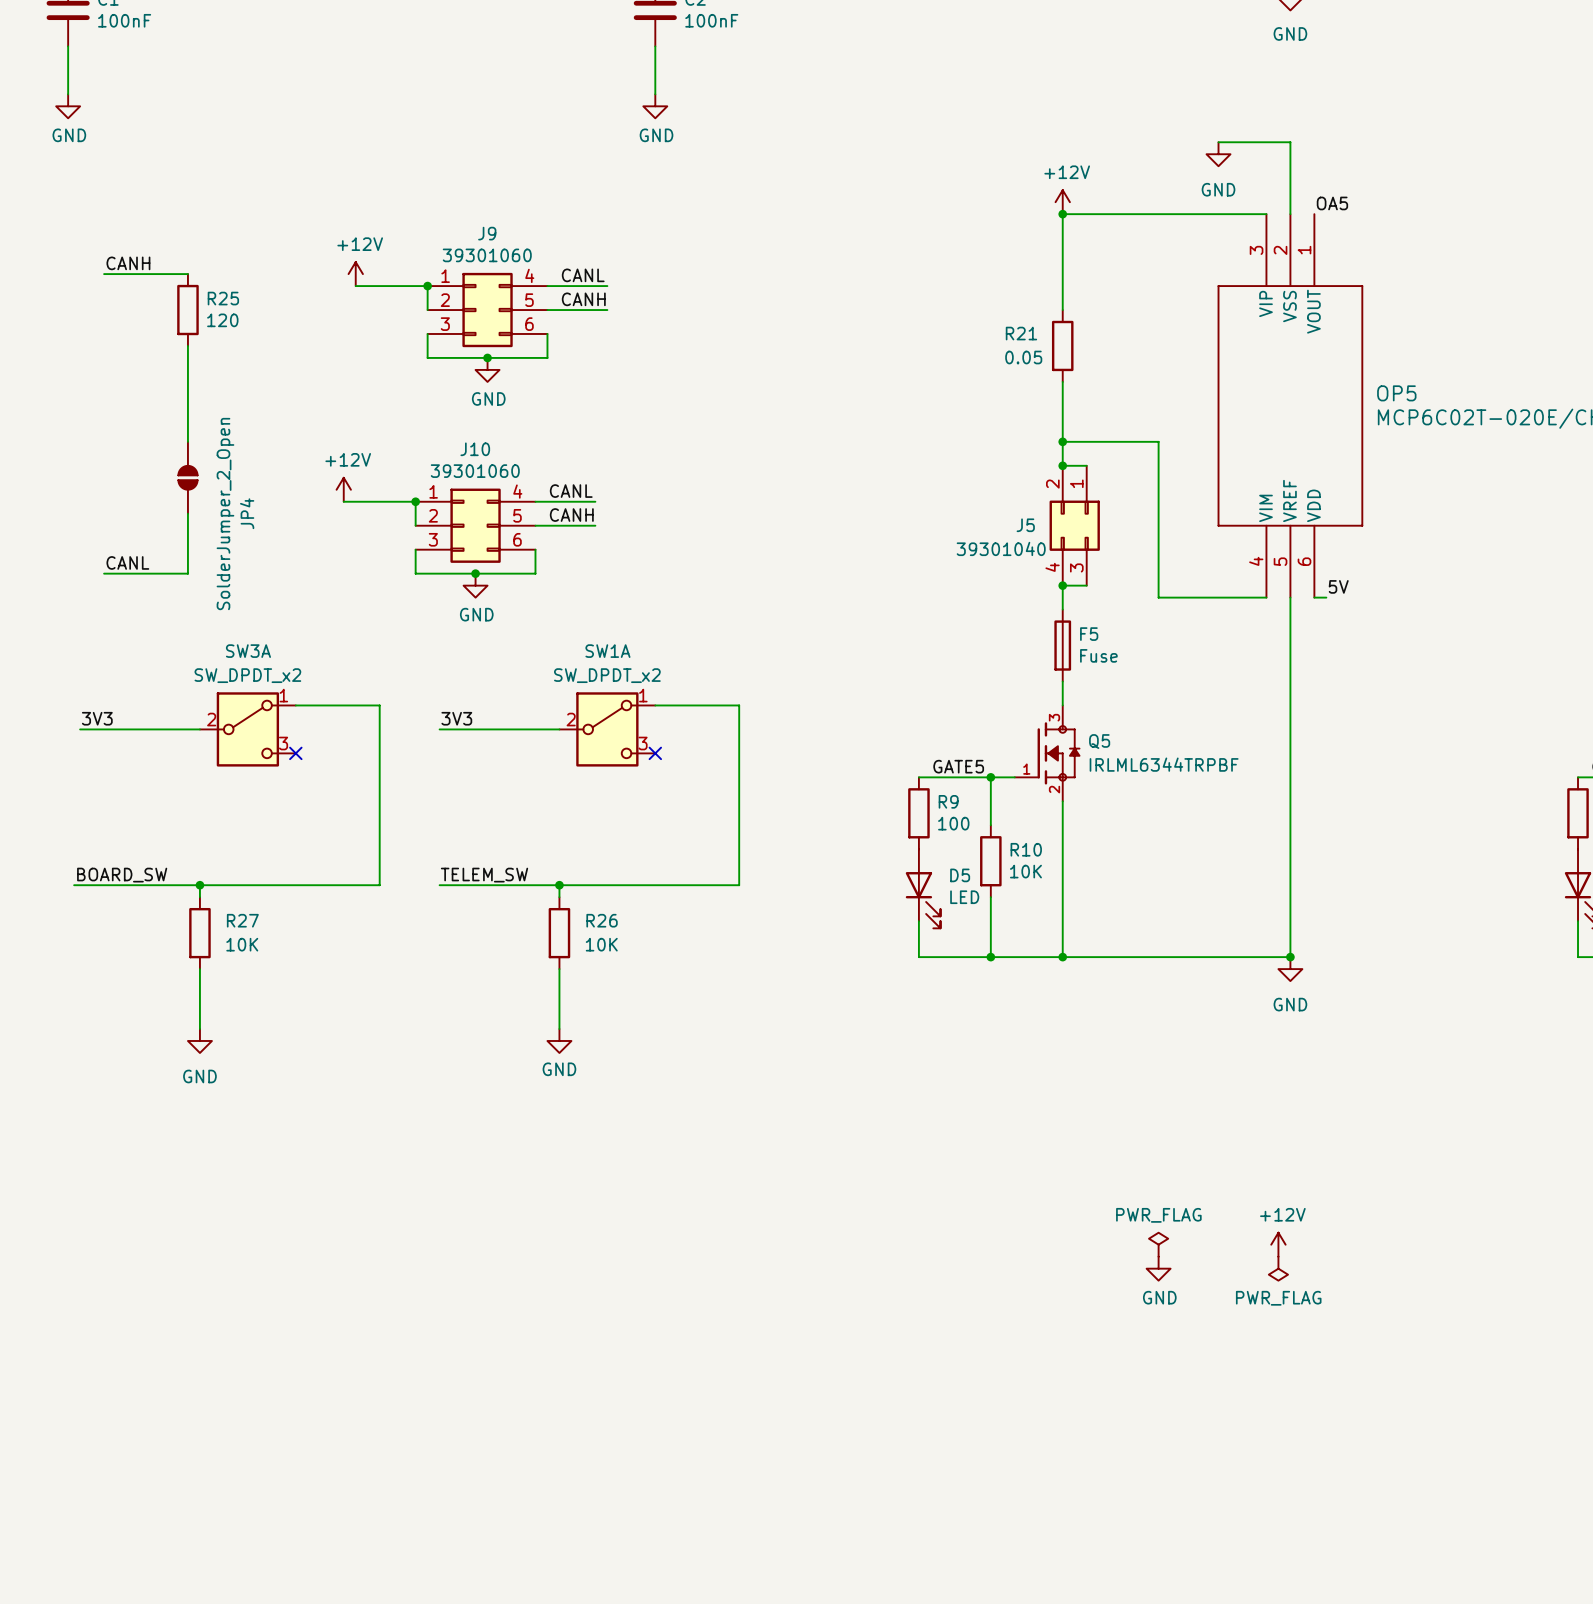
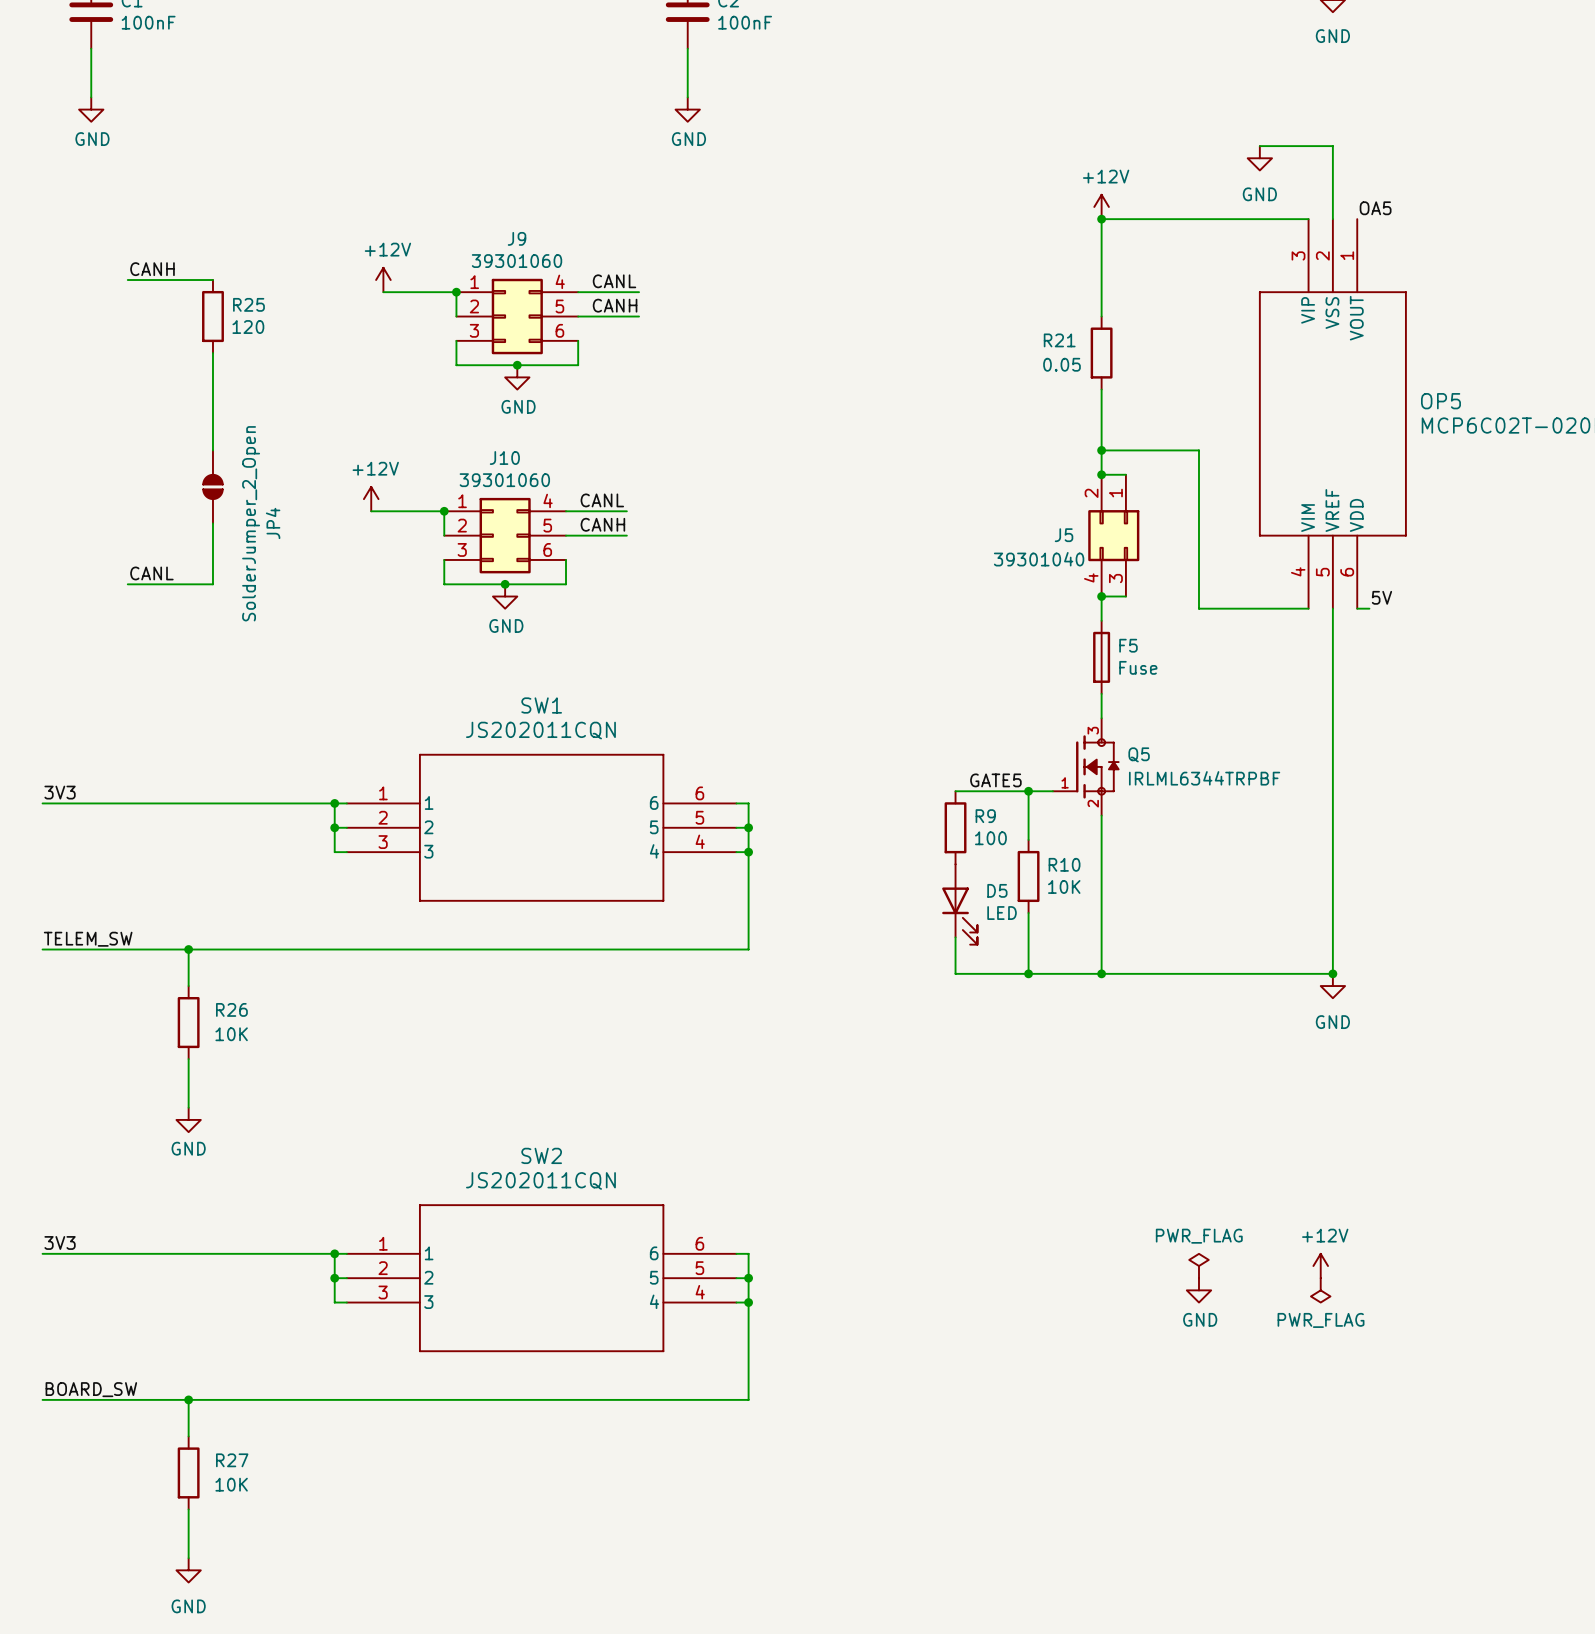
wire: (295, 705) (379, 705) (379, 885) (74, 885) -> none
wire: (655, 705) (739, 705) (739, 885) (439, 885) -> none
label position: 3V3 (97, 718) -> 3V3 (60, 792)
label: 3V3 (456, 718) -> none
wire: (80, 729) (199, 729) -> none
SW3A: SW_DPDT_x2 (247, 729) -> none
wire: (439, 729) (559, 729) -> none
SW1A: SW_DPDT_x2 (607, 729) -> none
no-connect mark: (295, 753) -> none
no-connect mark: (655, 753) -> none
wire: none -> (42, 803) (346, 803)
wire: none -> (334, 803) (334, 852) (346, 852)
junction: none -> (334, 803)
wire: none -> (736, 803) (748, 803) (748, 949) (42, 949)
wire: none -> (334, 827) (346, 827)
junction: none -> (334, 827)
SW1: none -> JS202011CQN (541, 827)
wire: none -> (736, 827) (748, 827)
junction: none -> (748, 827)
wire: none -> (736, 852) (748, 852)
junction: none -> (748, 852)
label: BOARD_SW (122, 875) -> none
label: TELEM_SW (484, 875) -> none
wire: (199, 885) (199, 897) -> none
junction: (199, 885) -> none
wire: (559, 885) (559, 897) -> none
junction: (559, 885) -> none
label: none -> TELEM_SW (88, 939)
wire: none -> (188, 949) (188, 986)
junction: none -> (188, 949)
R27 position: (199, 933) -> (188, 1472)
R26 position: (559, 933) -> (188, 1022)
wire: (199, 969) (199, 1029) -> none
wire: (559, 969) (559, 1029) -> none
wire: none -> (188, 1059) (188, 1107)
power symbol position: GND (199, 1040) -> GND (188, 1119)
power symbol: GND (559, 1040) -> none
power symbol text position: GND (199, 1076) -> GND (188, 1148)
label: none -> 3V3 (60, 1242)
wire: none -> (42, 1253) (346, 1253)
wire: none -> (334, 1253) (334, 1302) (346, 1302)
junction: none -> (334, 1253)
wire: none -> (736, 1253) (748, 1253) (748, 1399) (42, 1399)
wire: none -> (334, 1278) (346, 1278)
junction: none -> (334, 1278)
SW2: none -> JS202011CQN (541, 1278)
wire: none -> (736, 1278) (748, 1278)
junction: none -> (748, 1278)
wire: none -> (736, 1302) (748, 1302)
junction: none -> (748, 1302)
label: none -> BOARD_SW (91, 1389)
wire: none -> (188, 1399) (188, 1436)
junction: none -> (188, 1399)
wire: none -> (188, 1509) (188, 1558)
power symbol: none -> GND (188, 1570)

